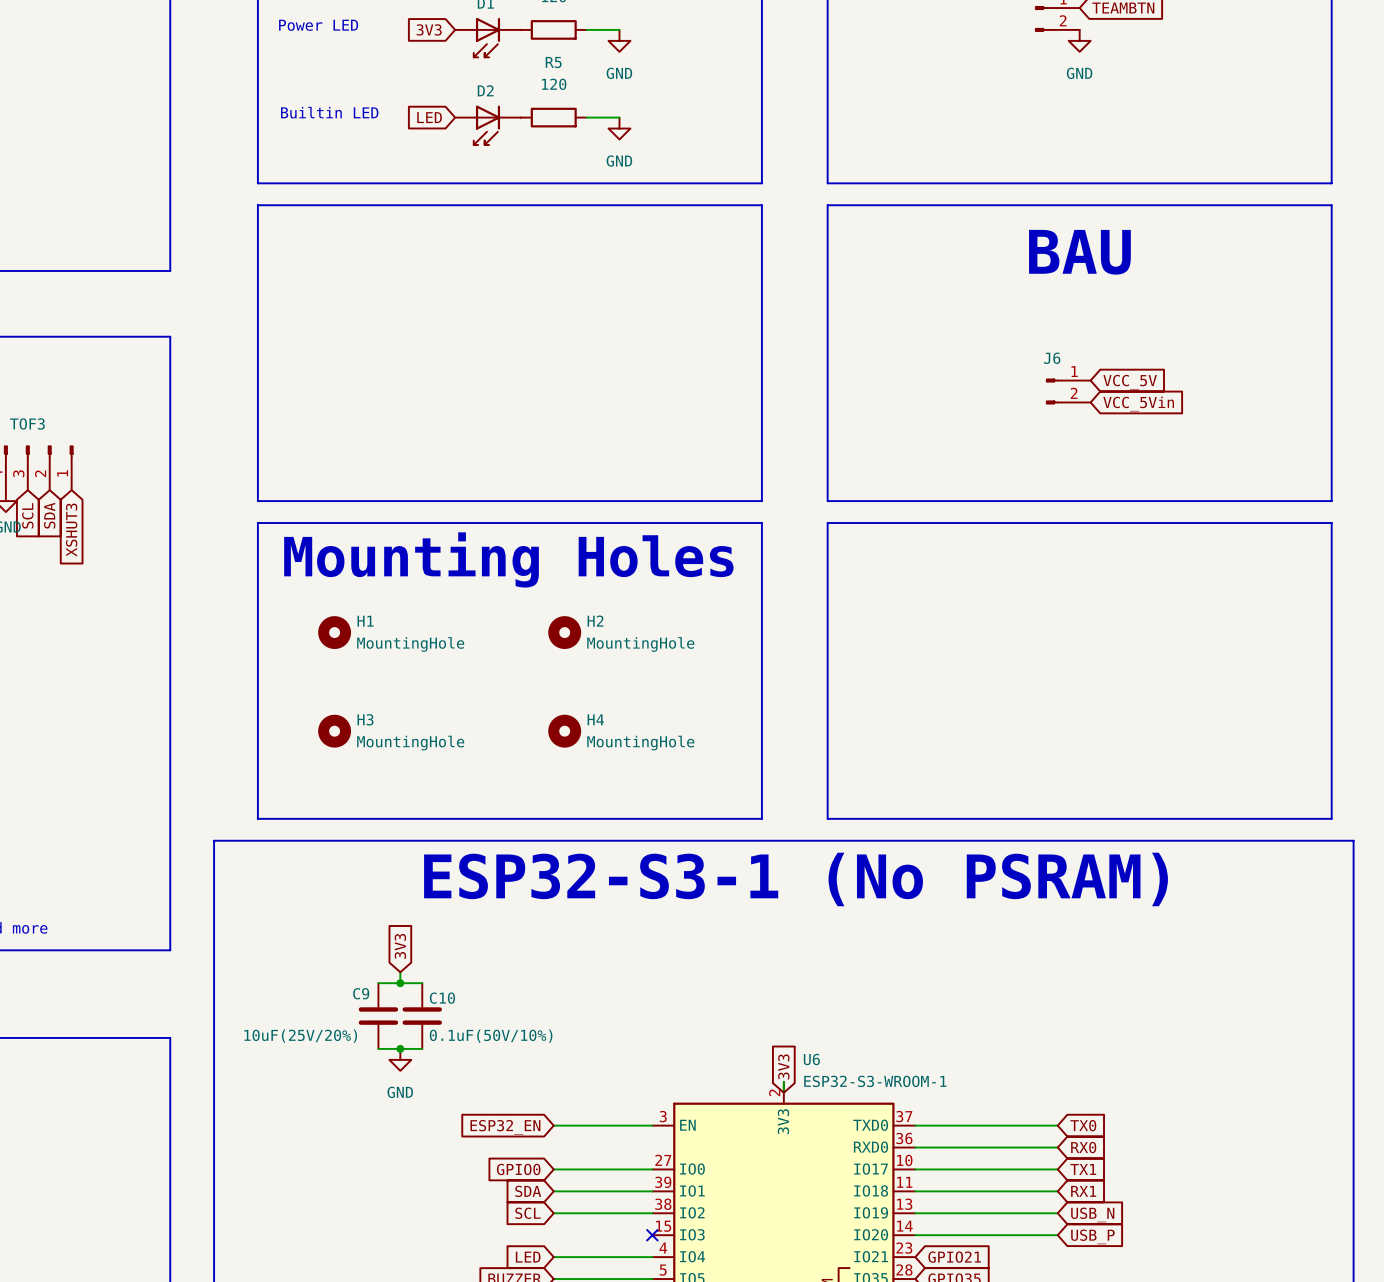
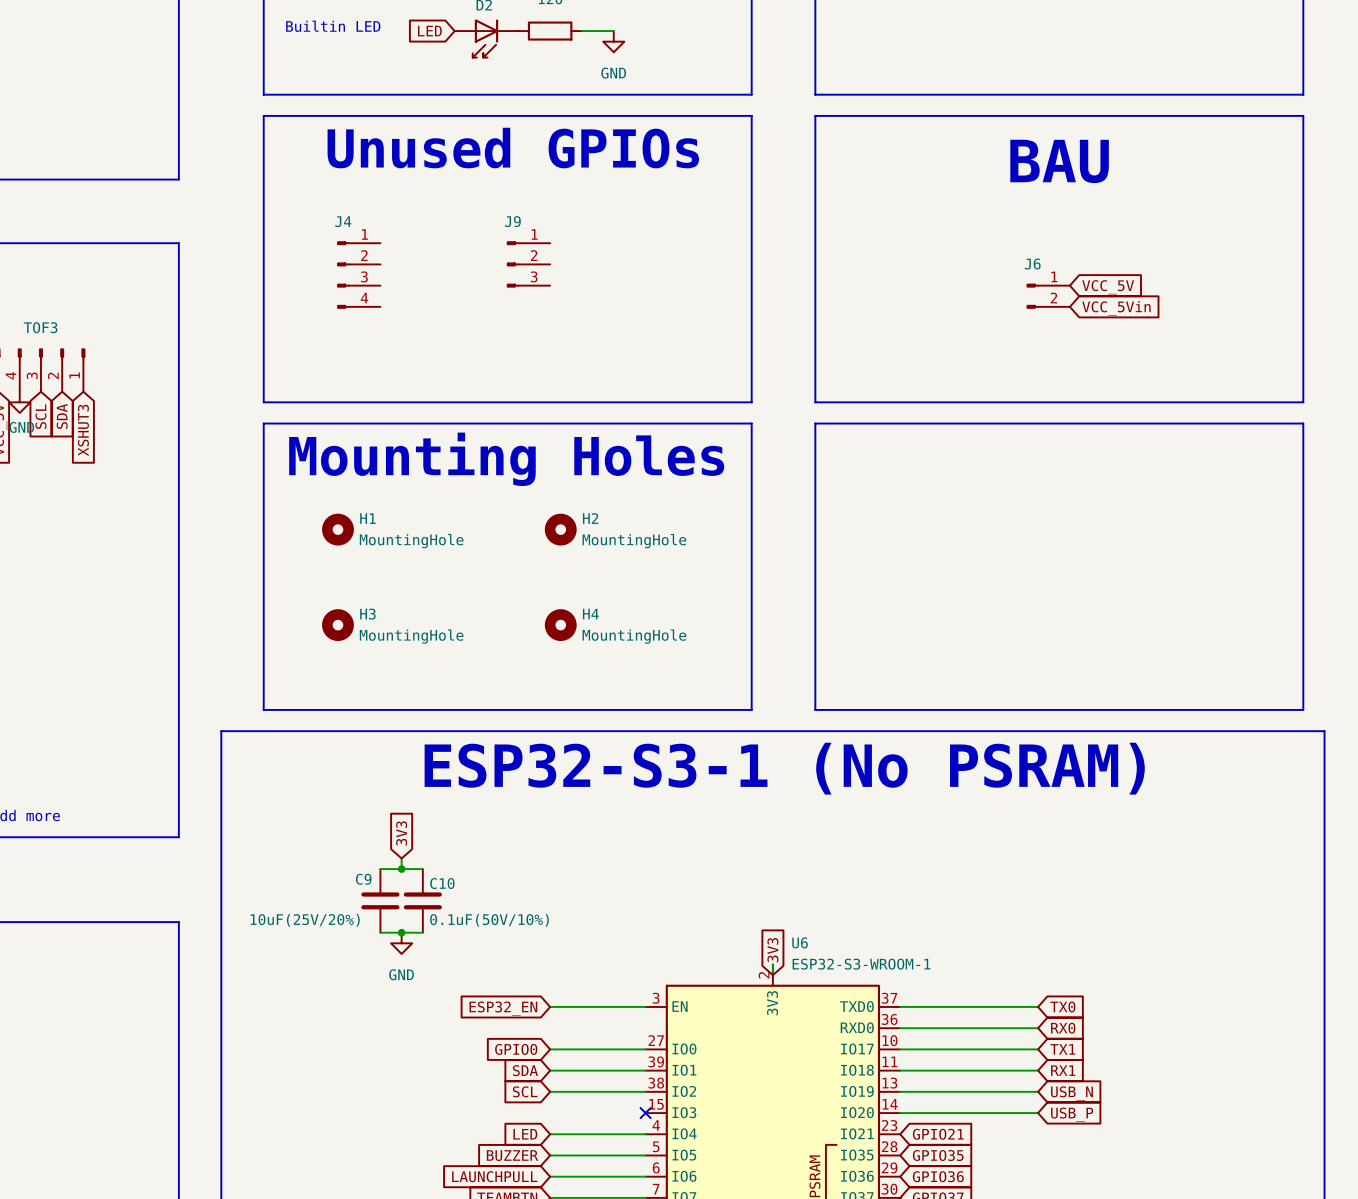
text: none -> Unused GPIOs (513, 148)
J9: none -> (528, 264)
J4: none -> (358, 275)

